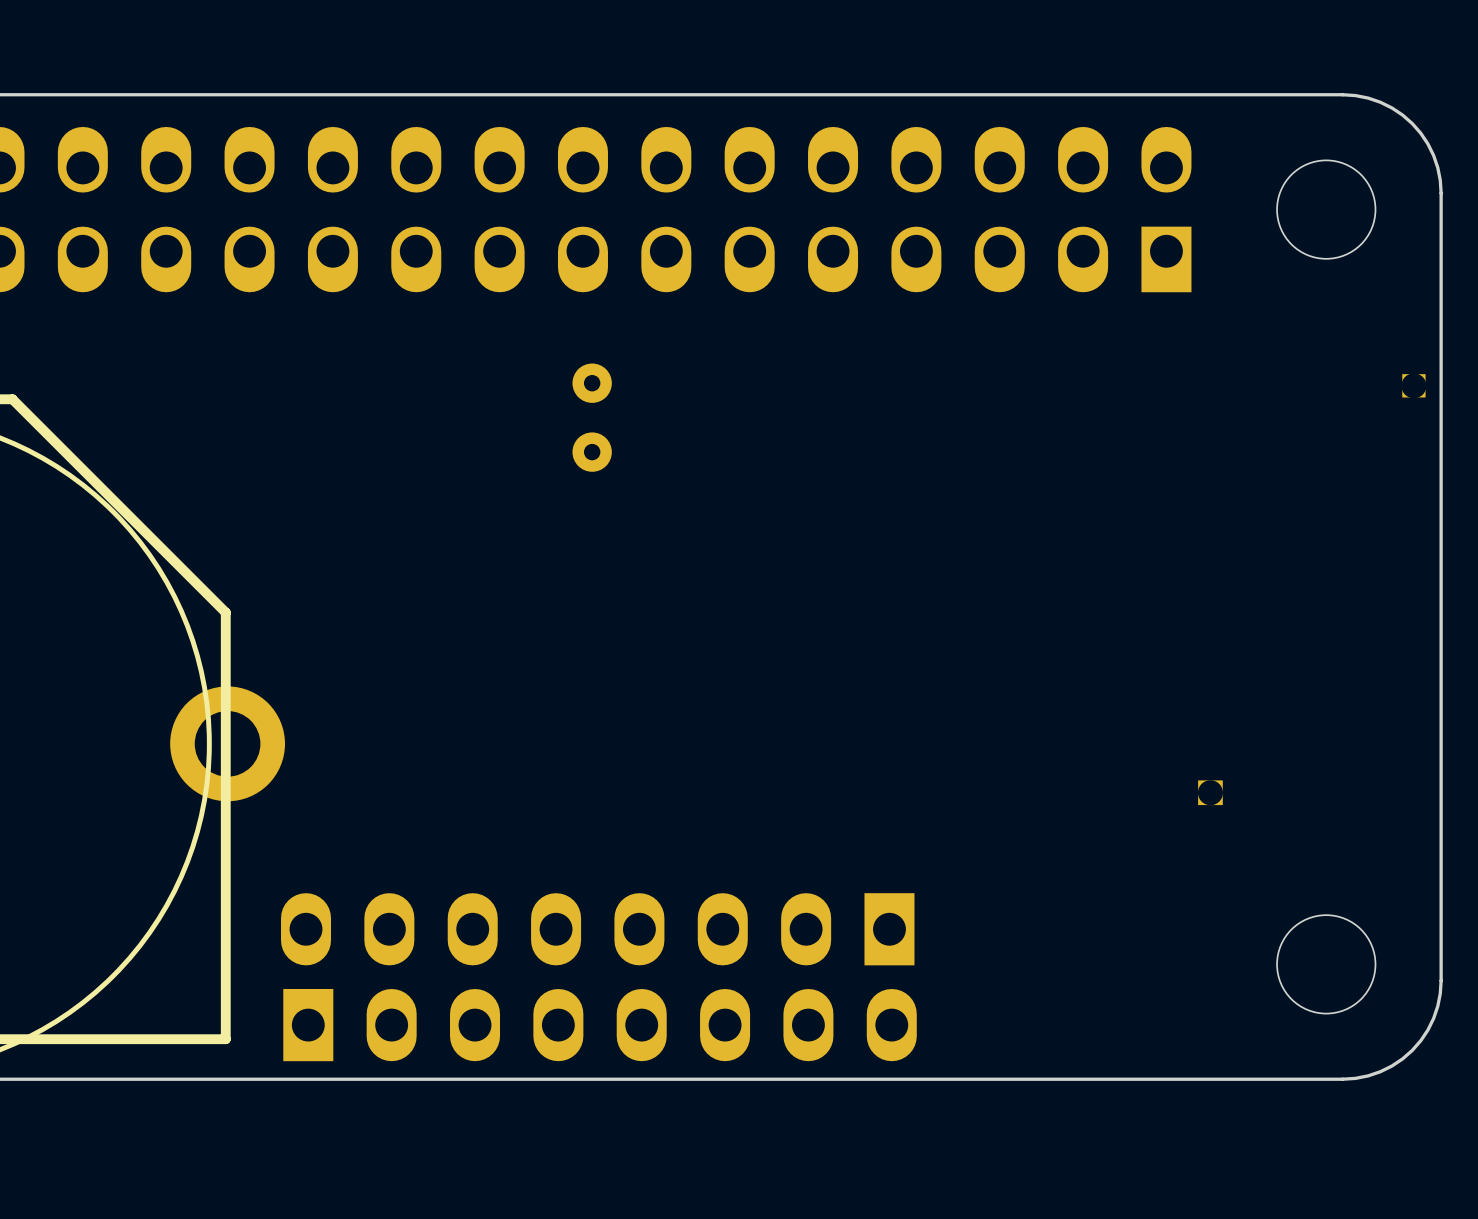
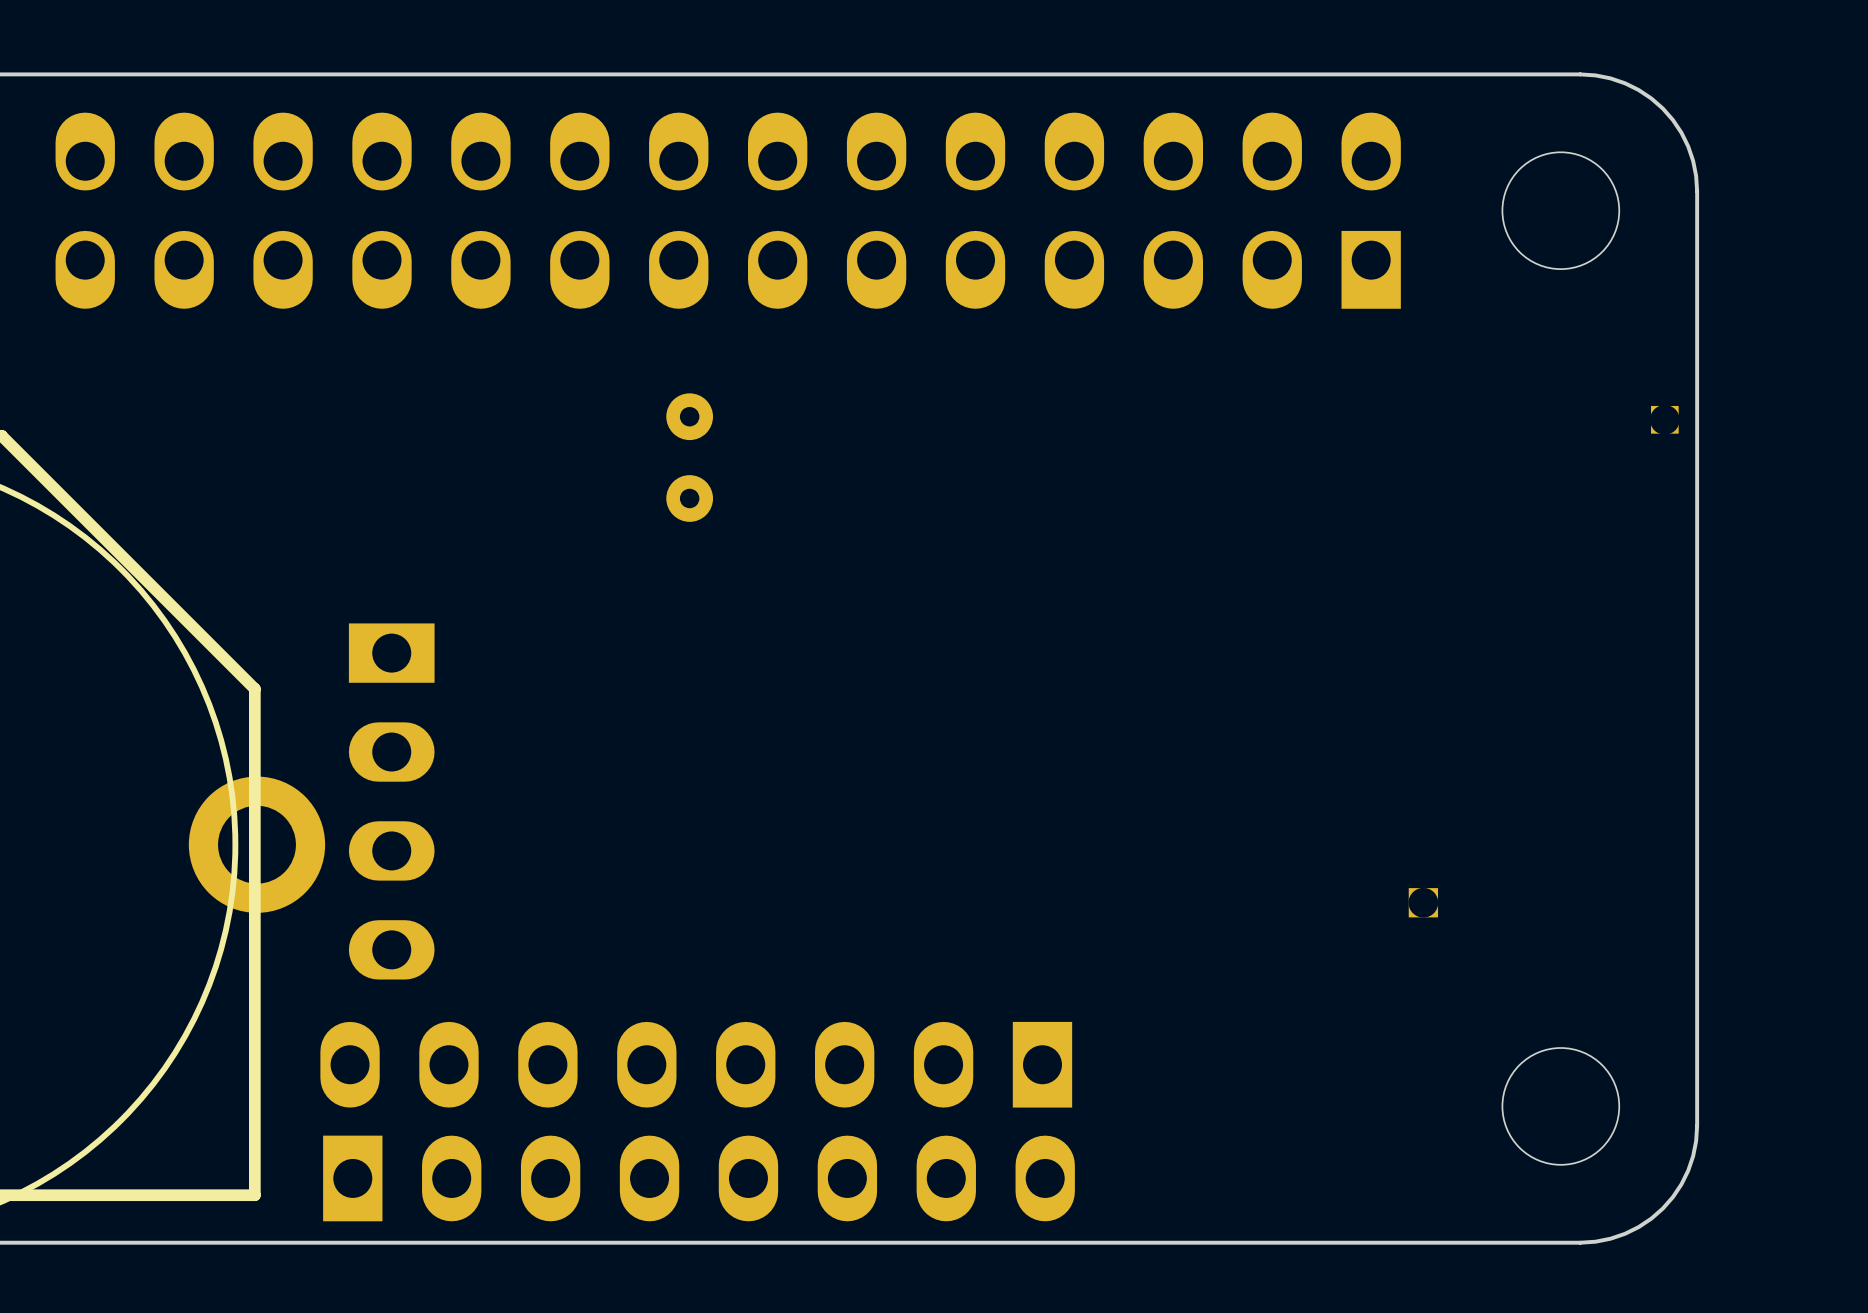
part: none -> (391, 801)

